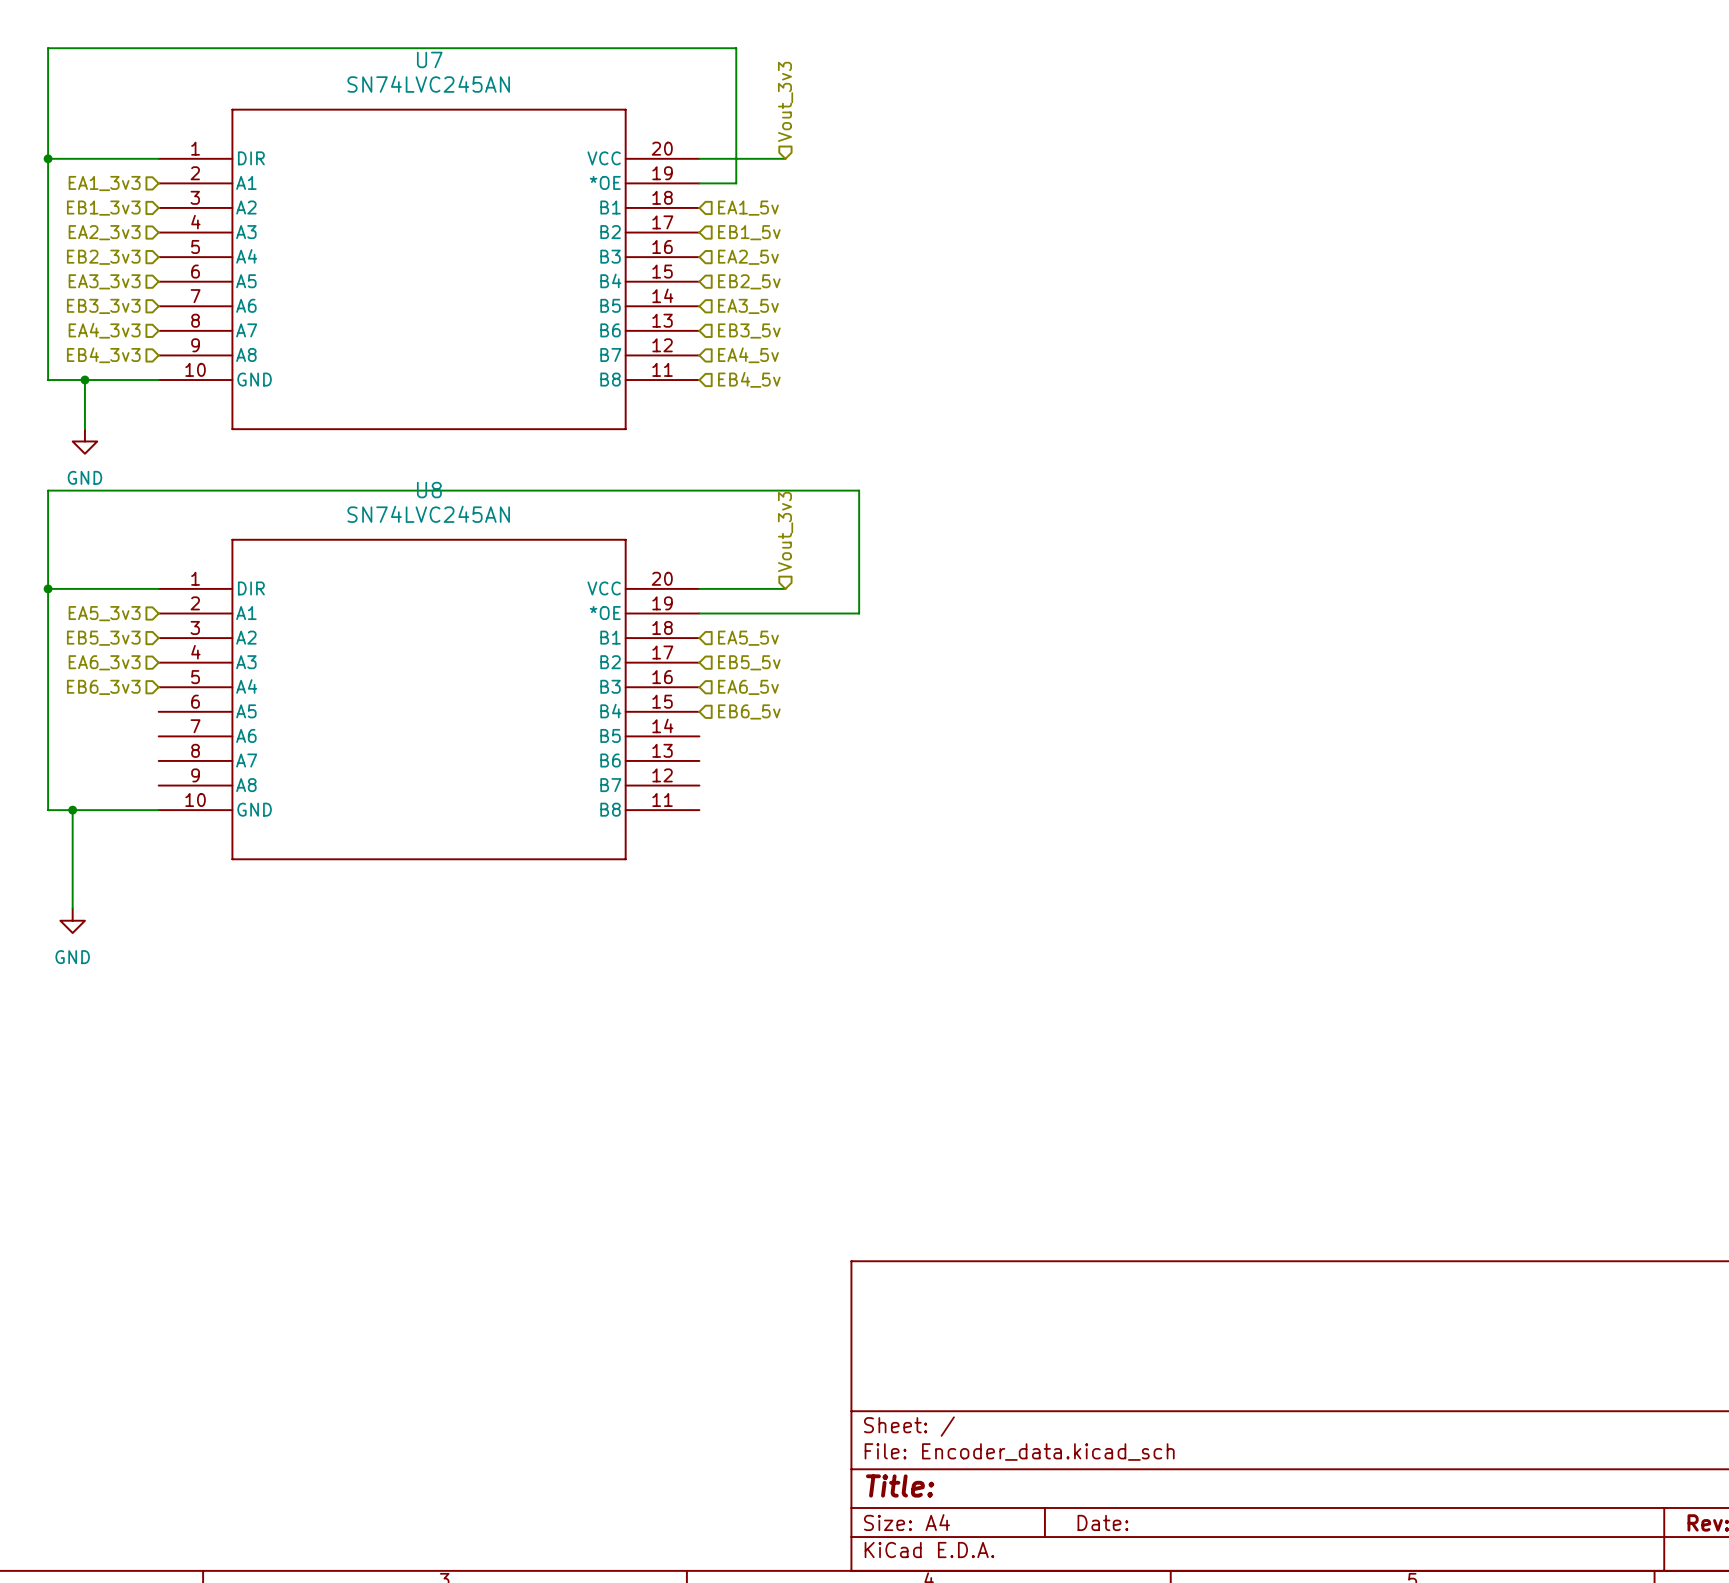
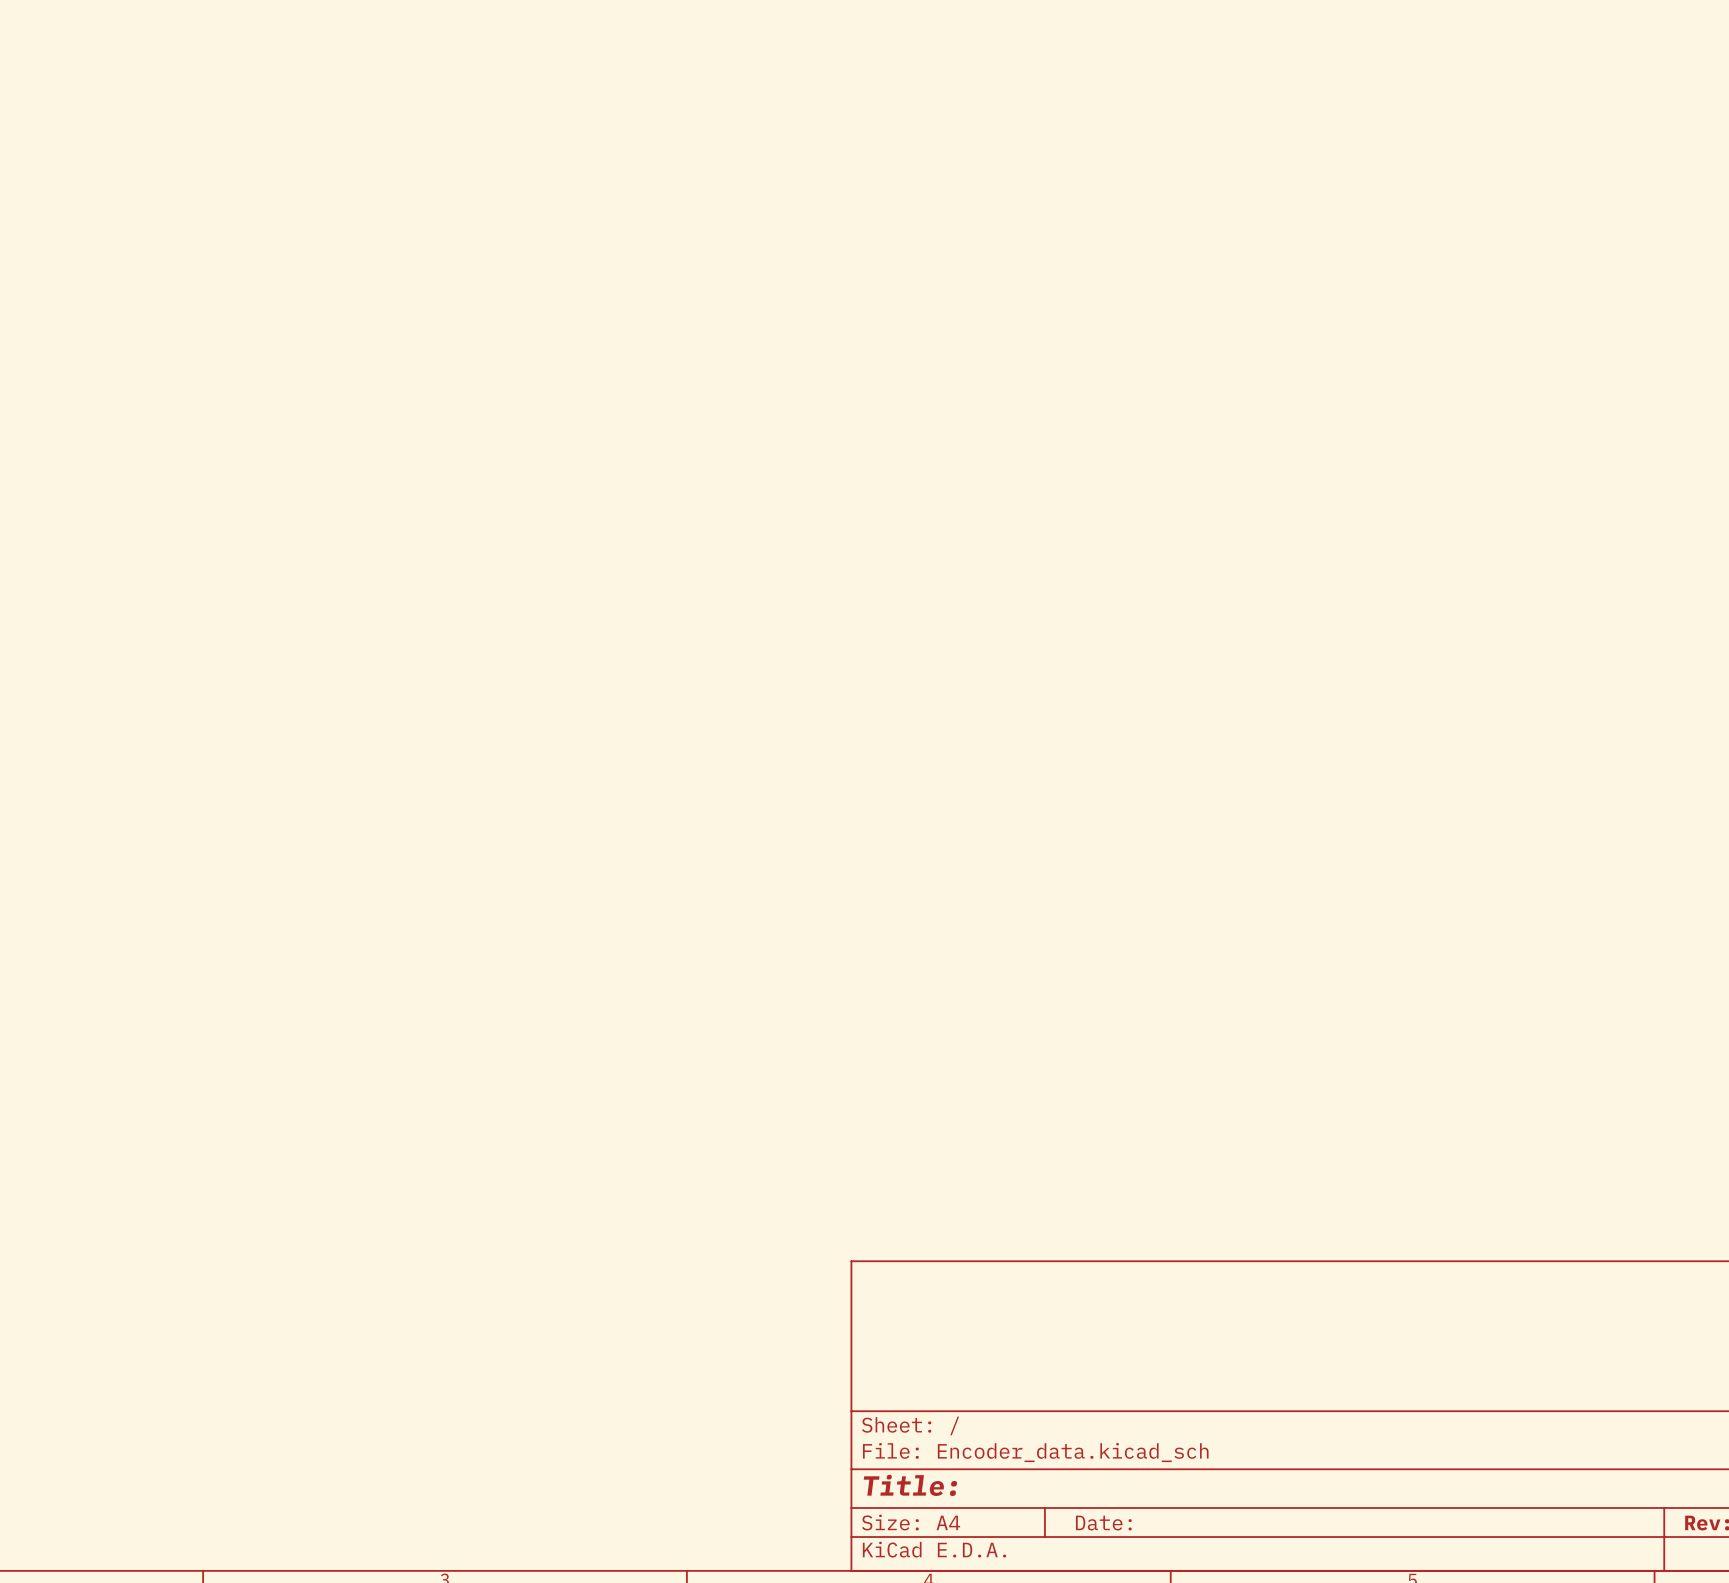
hierarchical label: Vout_3v3 (785, 101) -> none
wire: (48, 158) (158, 158) -> none
junction: (48, 158) -> none
wire: (699, 158) (785, 158) -> none
hierarchical label: EA1_3v3 (104, 183) -> none
wire: (699, 183) (736, 183) (736, 48) (48, 48) (48, 380) (158, 380) -> none
hierarchical label: EB1_3v3 (103, 208) -> none
hierarchical label: EA1_5v (748, 208) -> none
hierarchical label: EA2_3v3 (104, 232) -> none
hierarchical label: EB1_5v (749, 232) -> none
hierarchical label: EB2_3v3 (103, 257) -> none
hierarchical label: EA2_5v (748, 257) -> none
U7: SN74LVC245AN (429, 269) -> none
hierarchical label: EA3_3v3 (104, 281) -> none
hierarchical label: EB2_5v (749, 281) -> none
hierarchical label: EB3_3v3 (103, 306) -> none
hierarchical label: EA3_5v (748, 306) -> none
hierarchical label: EA4_3v3 (104, 330) -> none
hierarchical label: EB3_5v (749, 330) -> none
hierarchical label: EB4_3v3 (103, 355) -> none
hierarchical label: EA4_5v (748, 355) -> none
hierarchical label: EB4_5v (749, 379) -> none
wire: (84, 380) (84, 429) -> none
junction: (84, 380) -> none
power symbol: GND (84, 441) -> none
hierarchical label: Vout_3v3 (785, 531) -> none
wire: (48, 588) (158, 588) -> none
junction: (48, 588) -> none
wire: (699, 588) (785, 588) -> none
hierarchical label: EA5_3v3 (104, 613) -> none
wire: (699, 613) (859, 613) (859, 490) (48, 490) (48, 810) (158, 810) -> none
hierarchical label: EB5_3v3 (103, 638) -> none
hierarchical label: EA5_5v (748, 638) -> none
hierarchical label: EA6_3v3 (104, 662) -> none
hierarchical label: EB5_5v (749, 662) -> none
hierarchical label: EB6_3v3 (103, 687) -> none
hierarchical label: EA6_5v (748, 687) -> none
U8: SN74LVC245AN (429, 699) -> none
hierarchical label: EB6_5v (749, 711) -> none
wire: (72, 810) (72, 908) -> none
junction: (72, 810) -> none
power symbol: GND (72, 920) -> none

